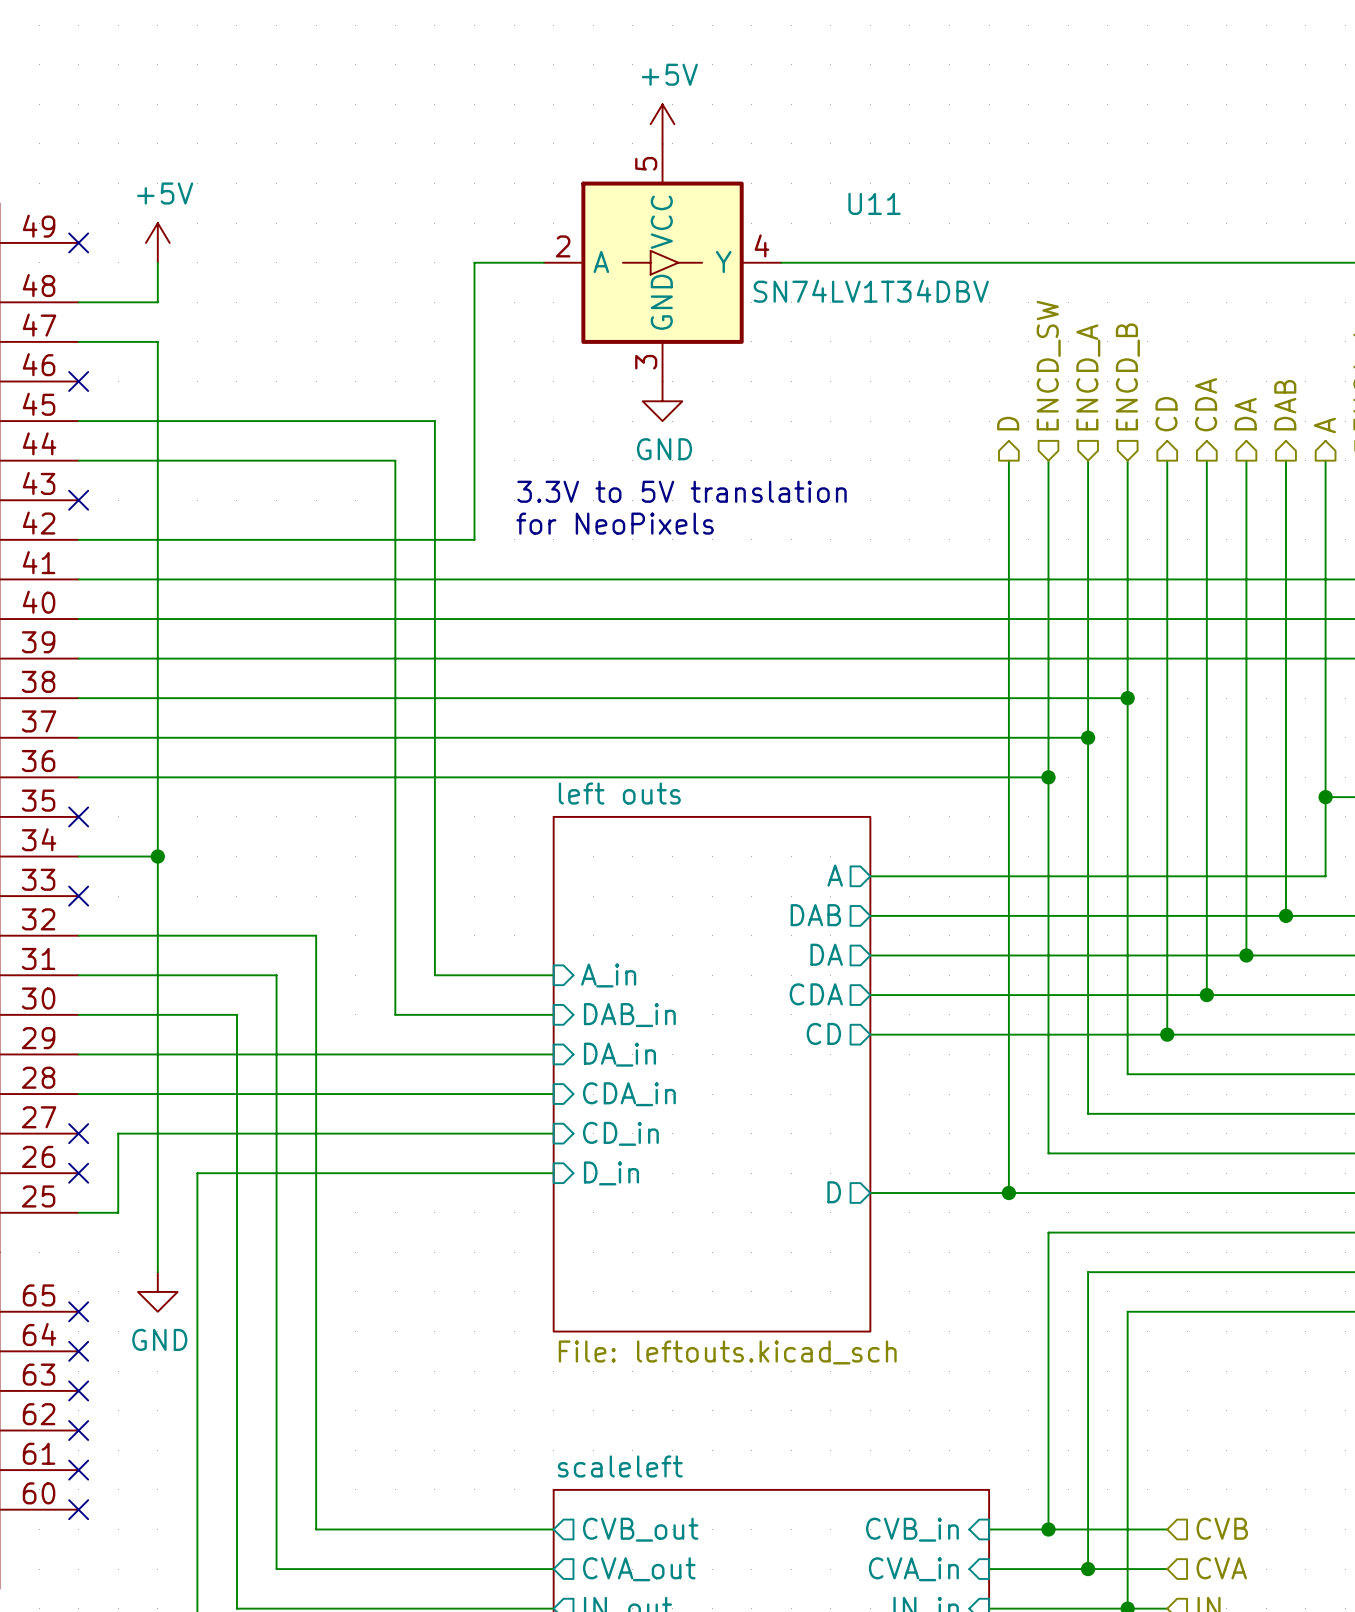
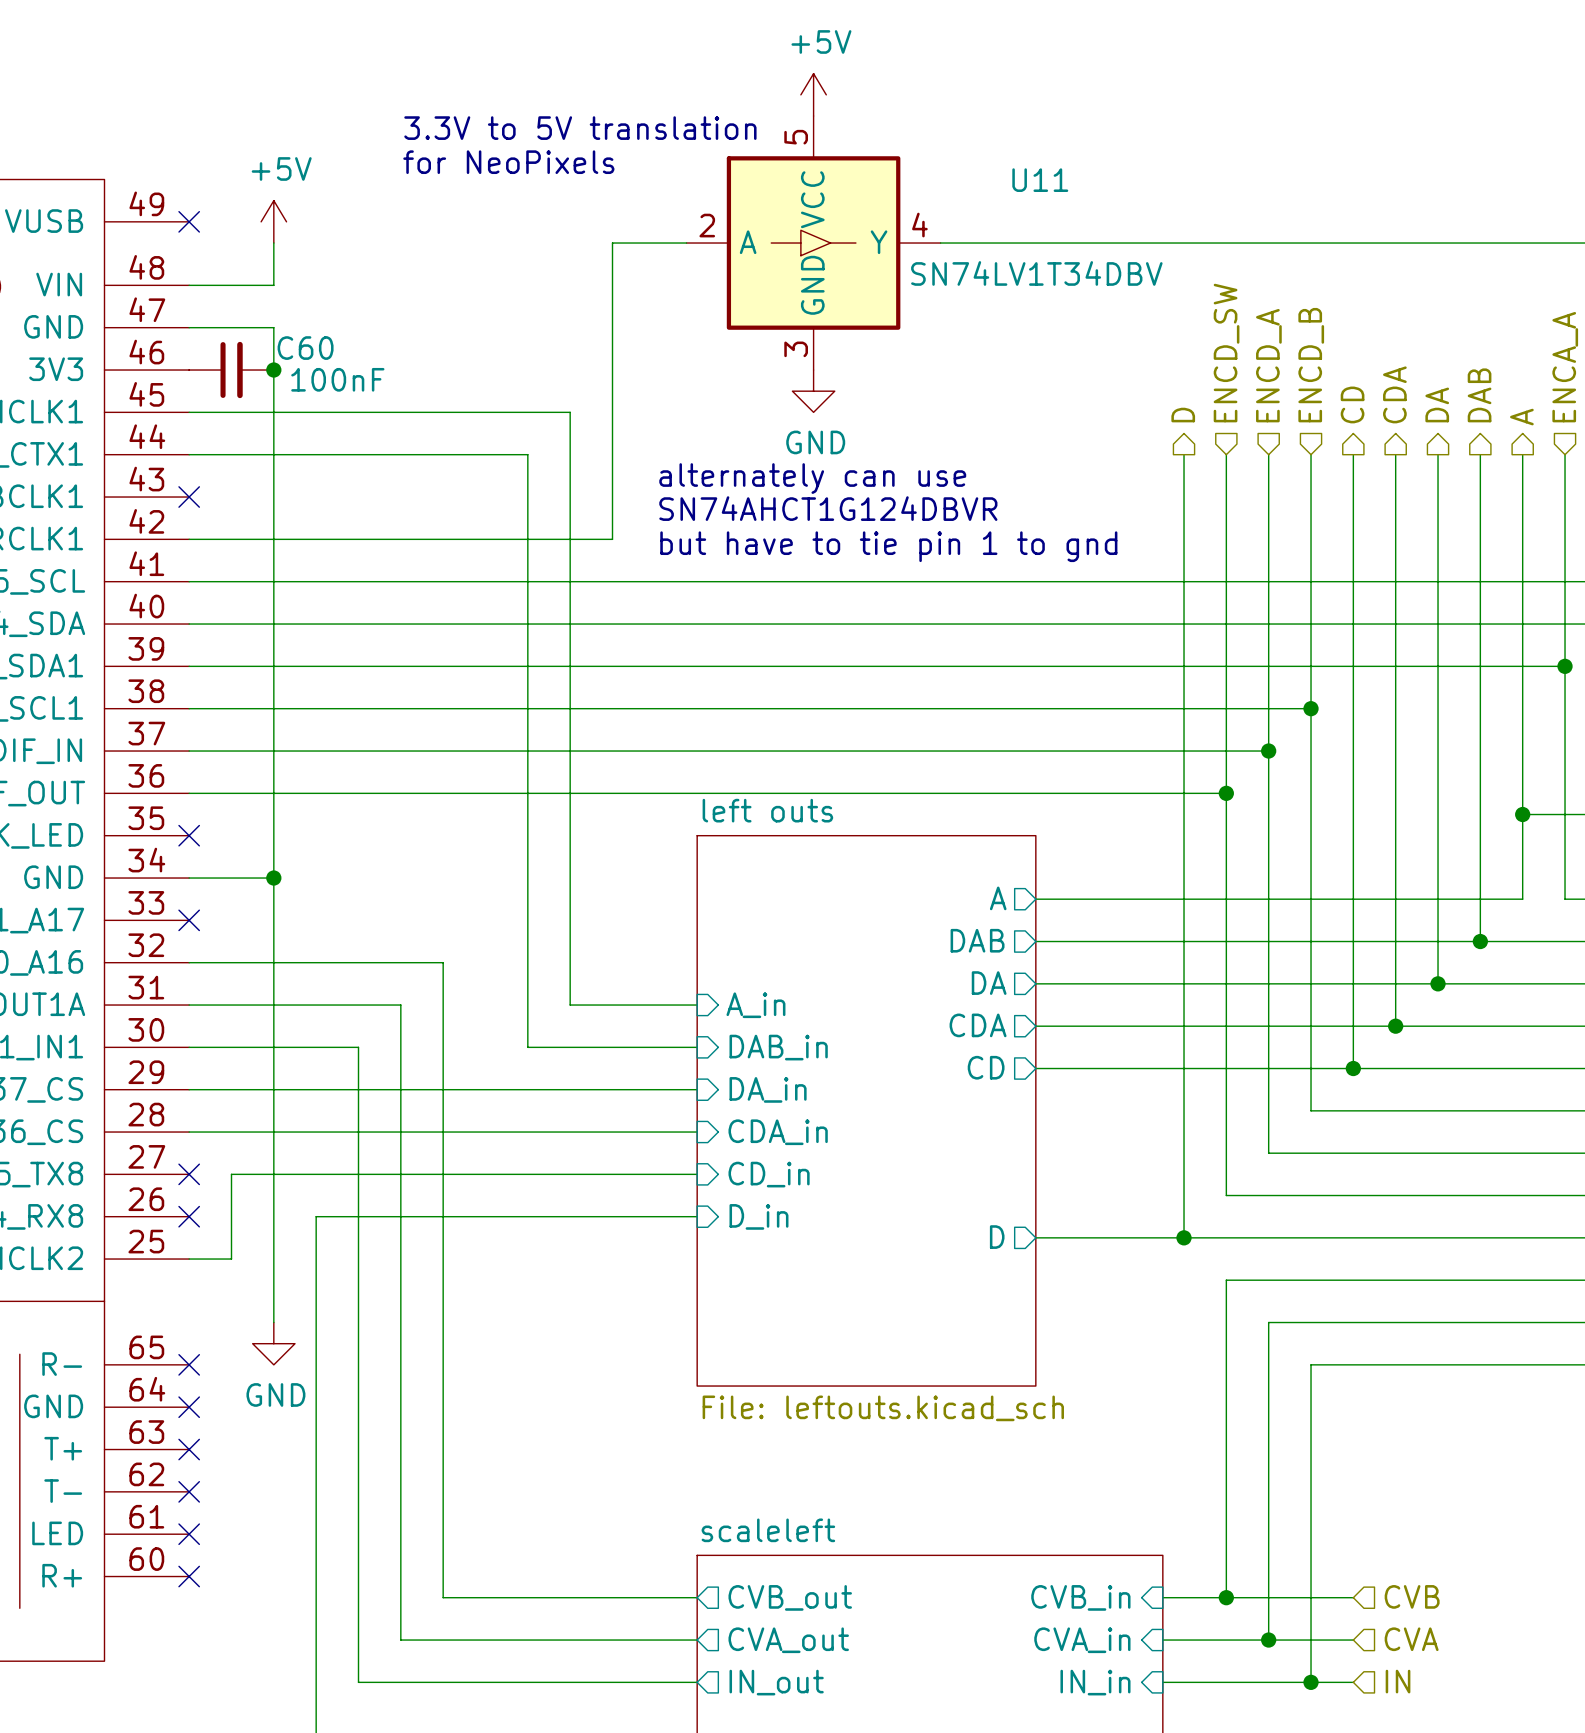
text: none -> 3.3V to 5V translation (580, 128)
text: none -> for NeoPixels (508, 162)
no-connect mark: (78, 381) -> none
C60: none -> 100nF (231, 370)
junction: none -> (273, 370)
text: none -> alternately can use (812, 478)
text: 3.3V to 5V translation (682, 491) -> none
text: none -> SN74AHCT1G124DBVR (828, 508)
text: for NeoPixels (615, 523) -> none
text: none -> but have to tie pin 1 to gnd (888, 546)

